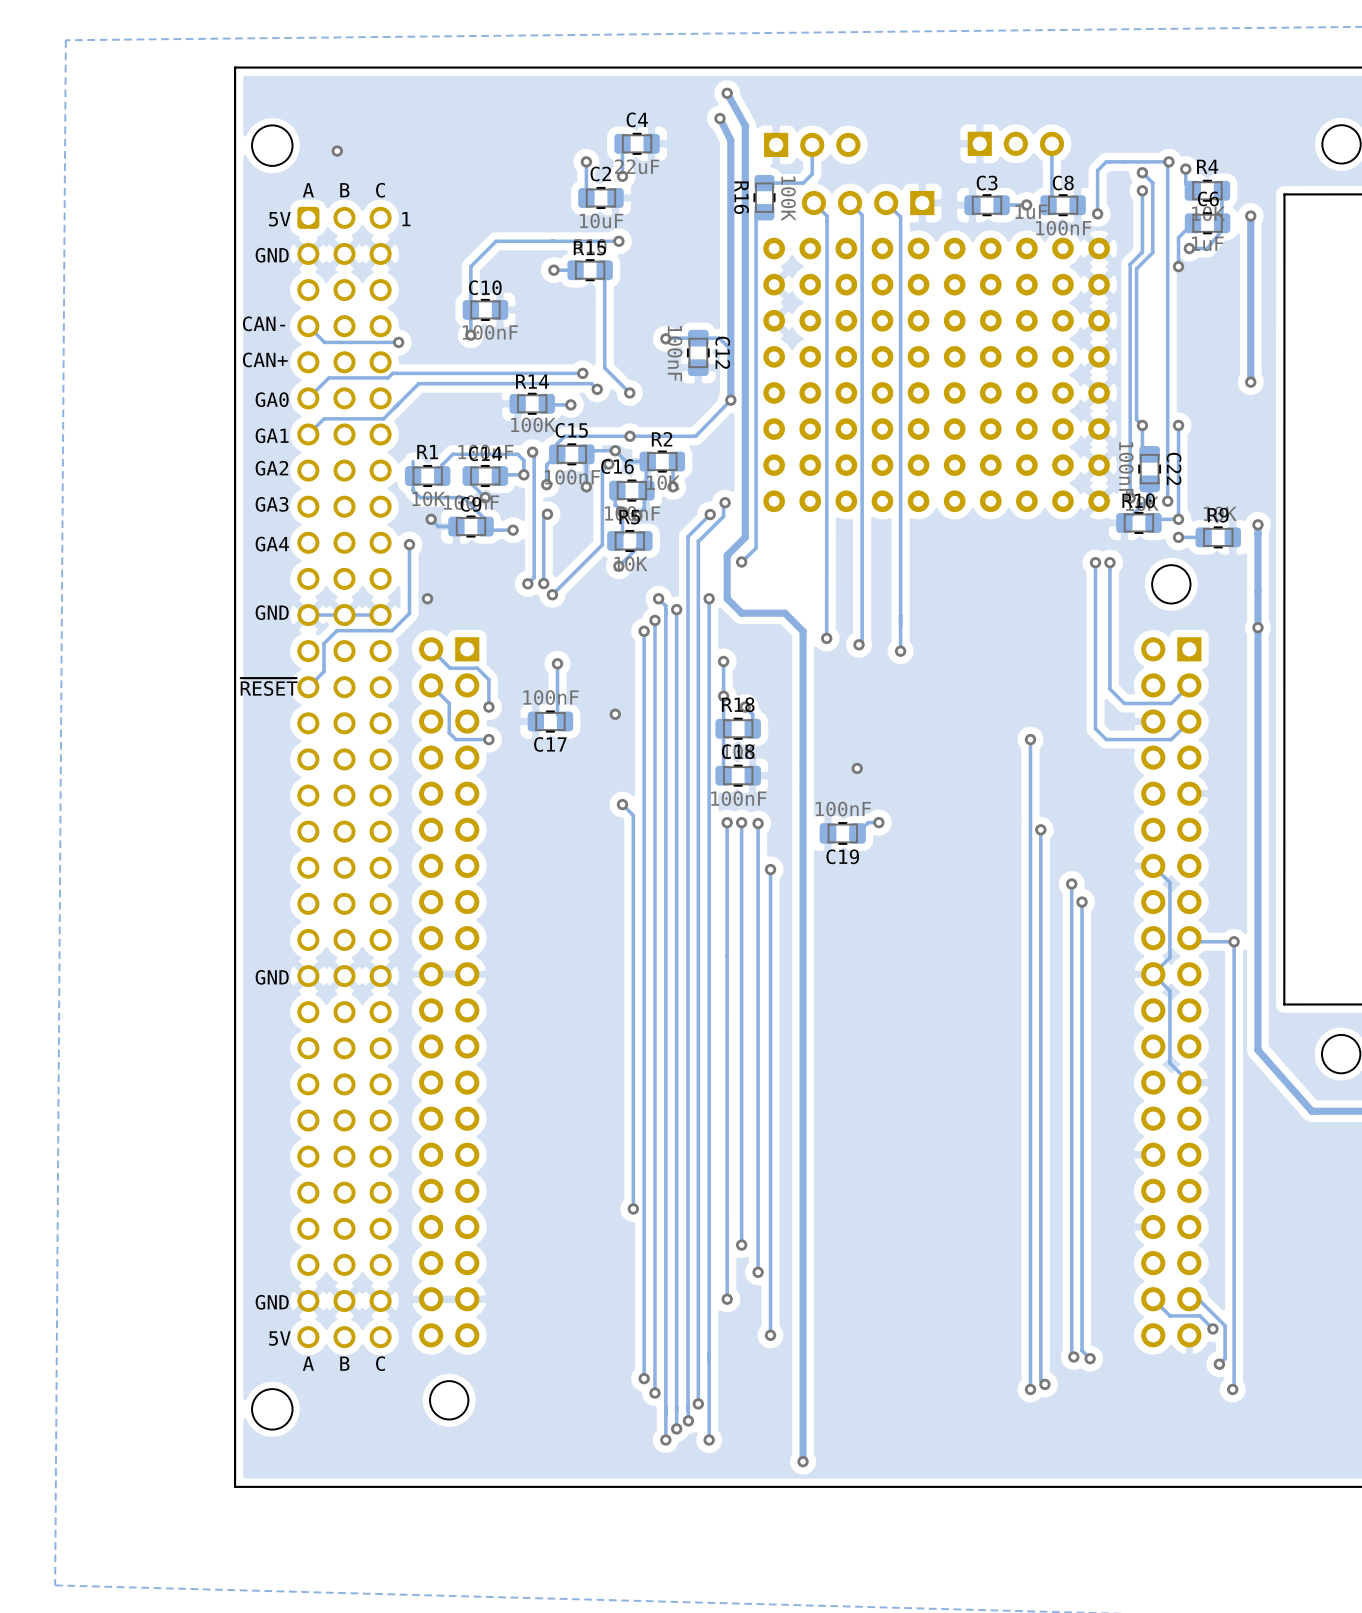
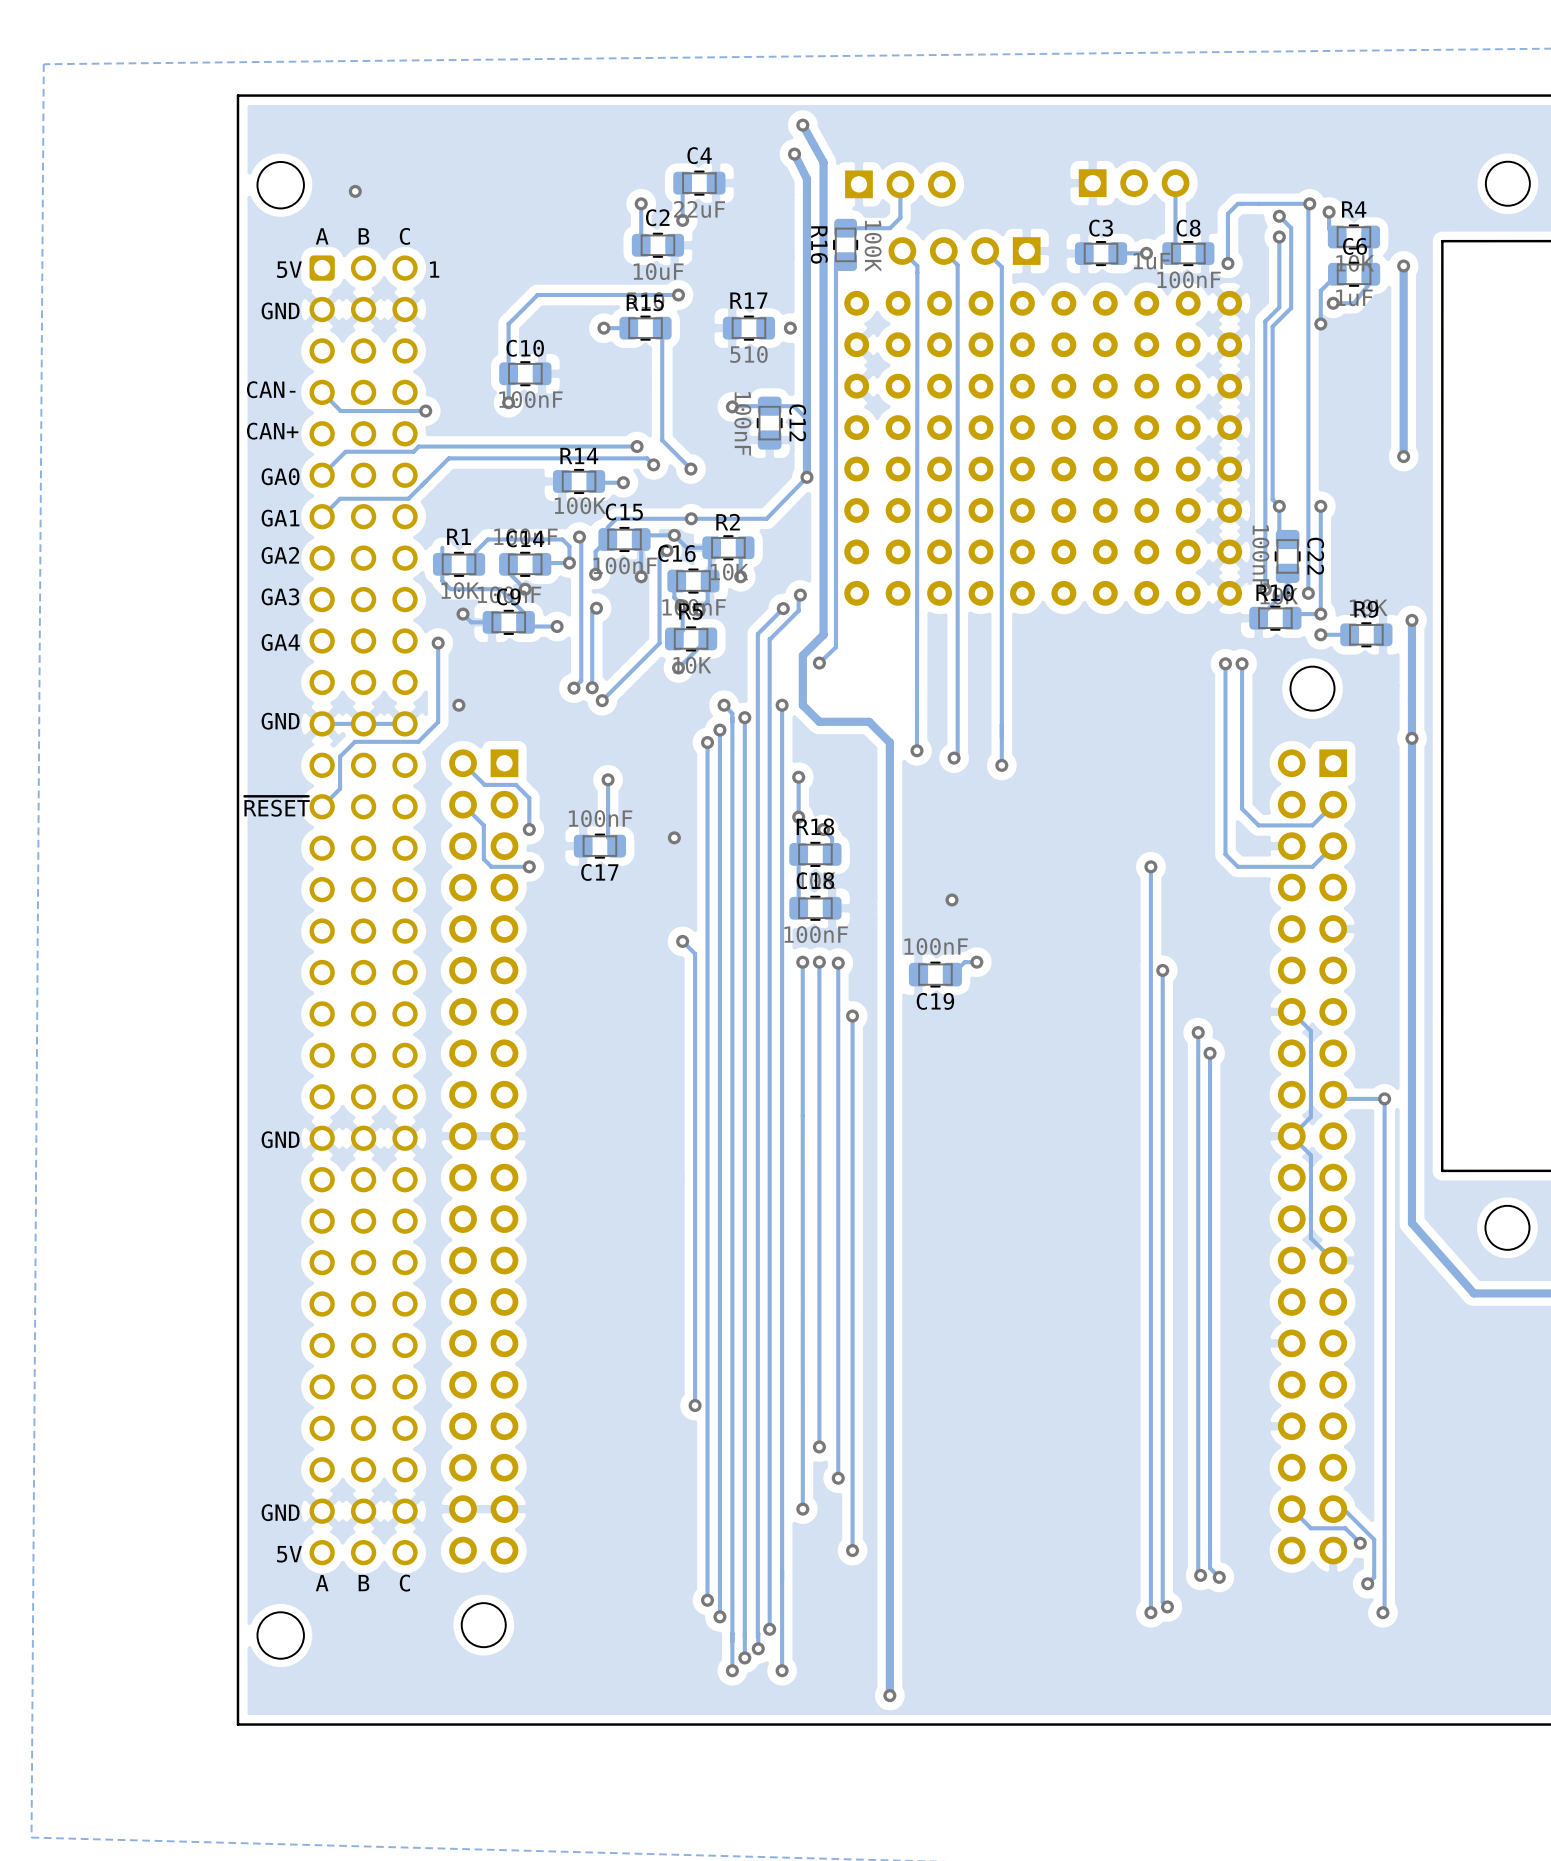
R17: none -> 510 (748, 328)
via: none -> (790, 328)

